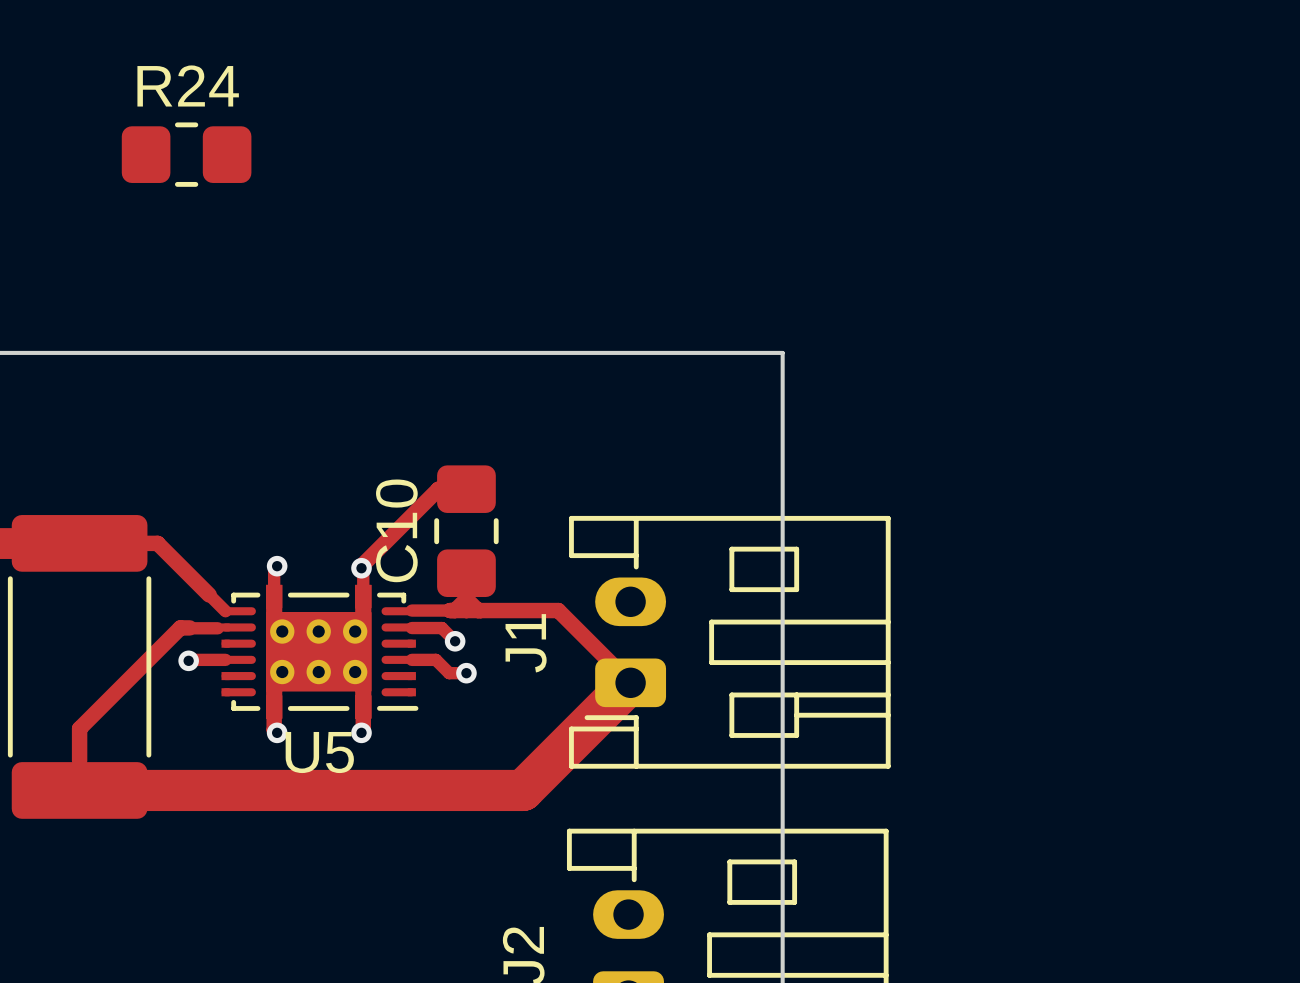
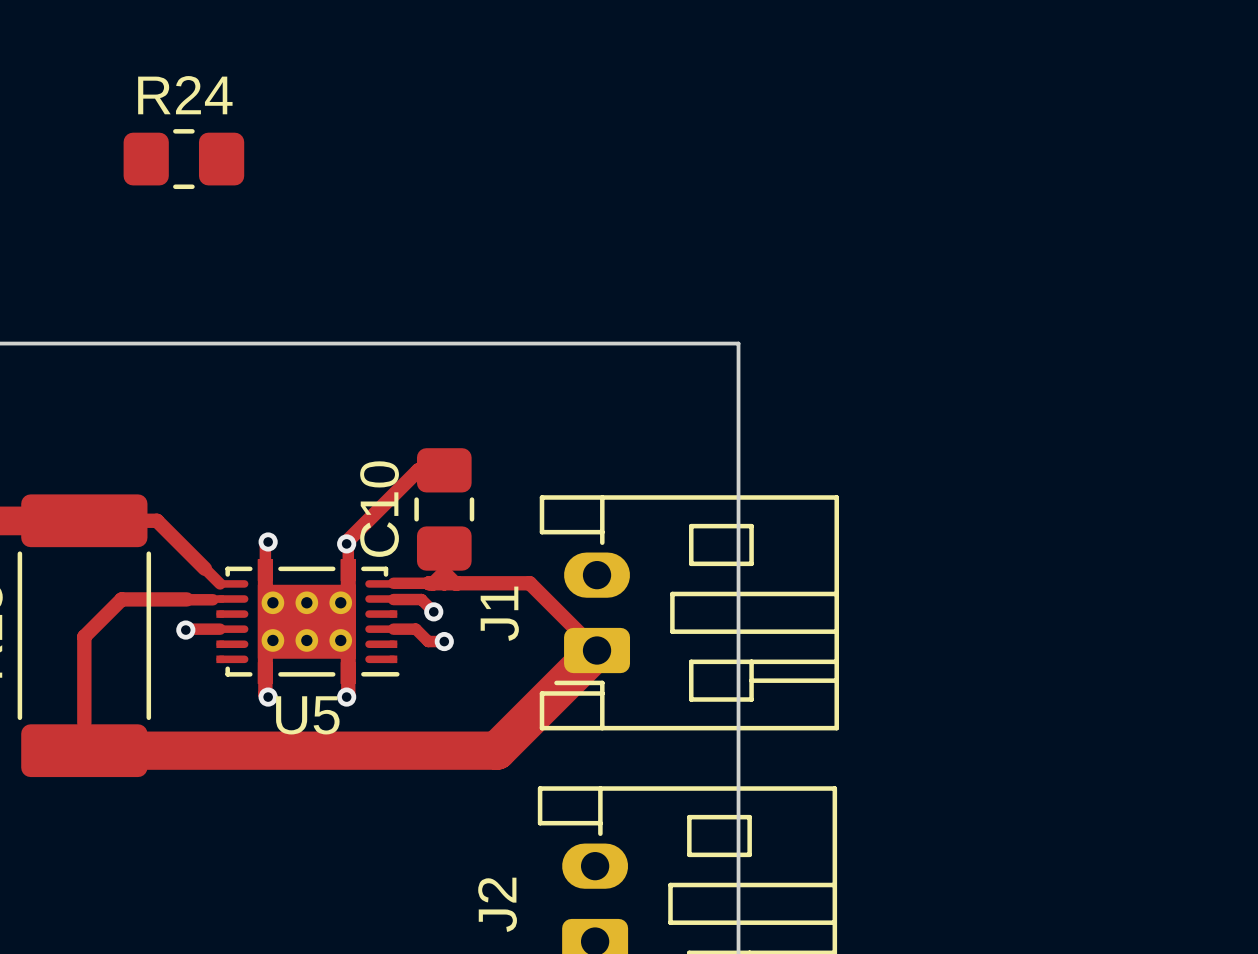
track: (180, 627) (79, 728) -> (178, 599) (121, 599) (84, 636) (84, 693)

